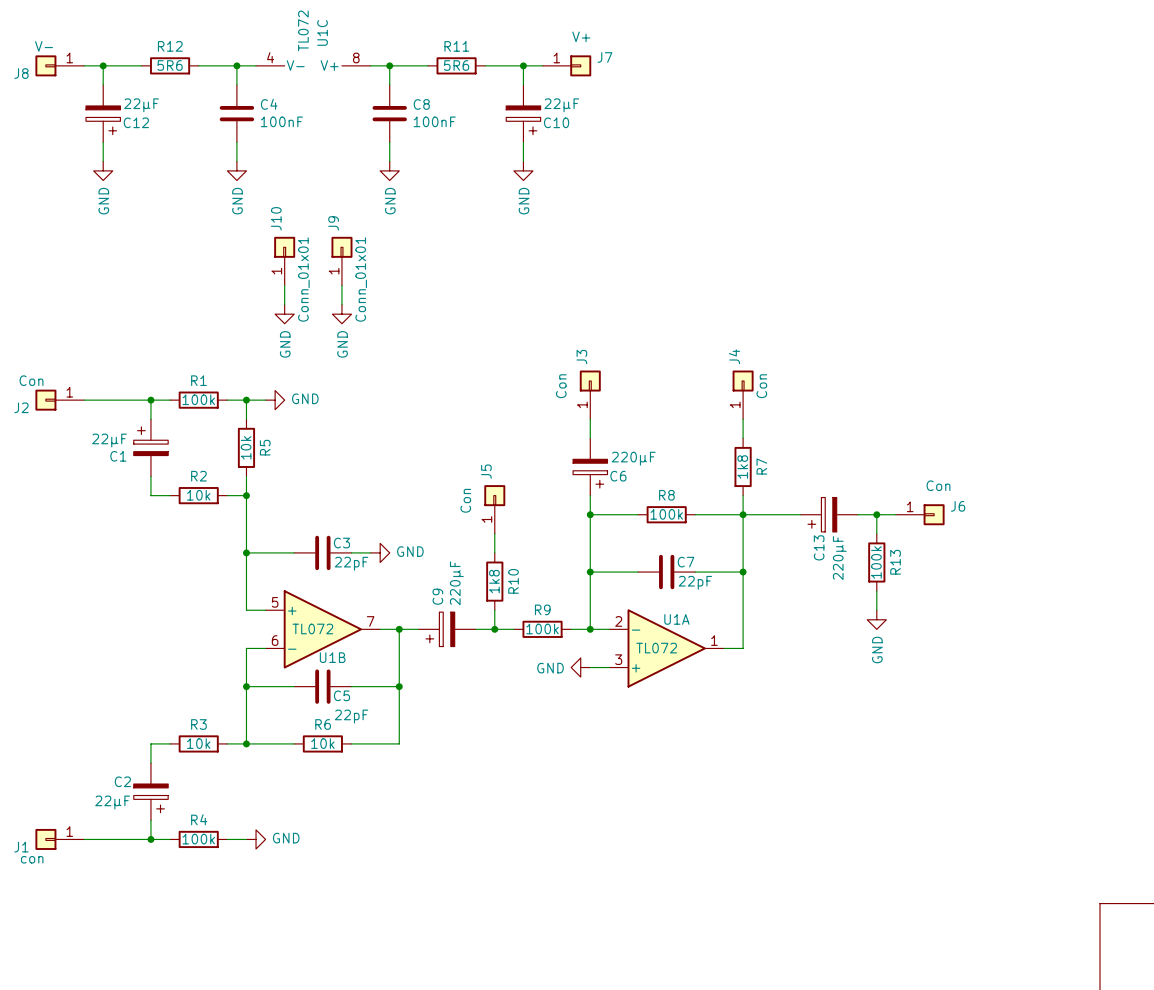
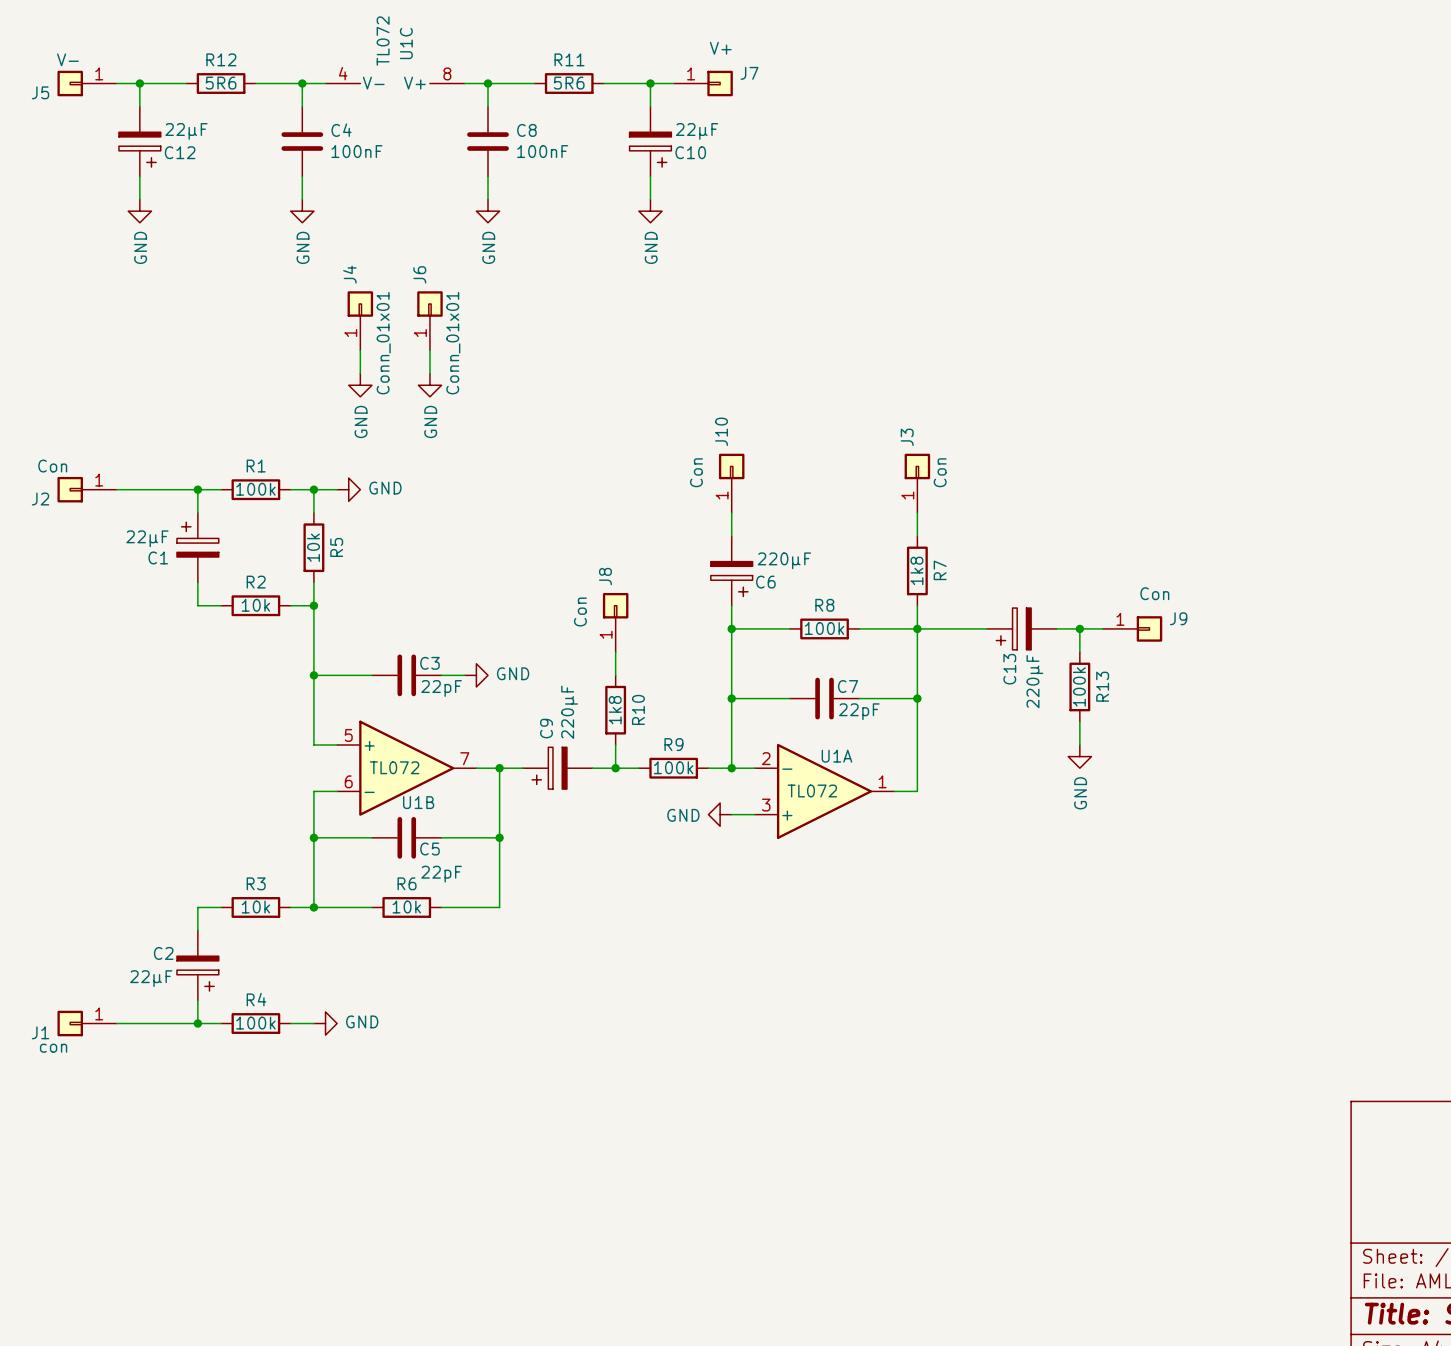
J8 name: J8 (21, 73) -> J5 (40, 92)
J10 name: J10 (276, 218) -> J4 (349, 274)
J9 name: J9 (333, 223) -> J6 (419, 274)
J4 name: J4 (734, 356) -> J3 (907, 437)
J3 name: J3 (581, 357) -> J10 (721, 431)
J5 name: J5 (486, 471) -> J8 (605, 576)
J6 name: J6 (958, 506) -> J9 (1178, 618)

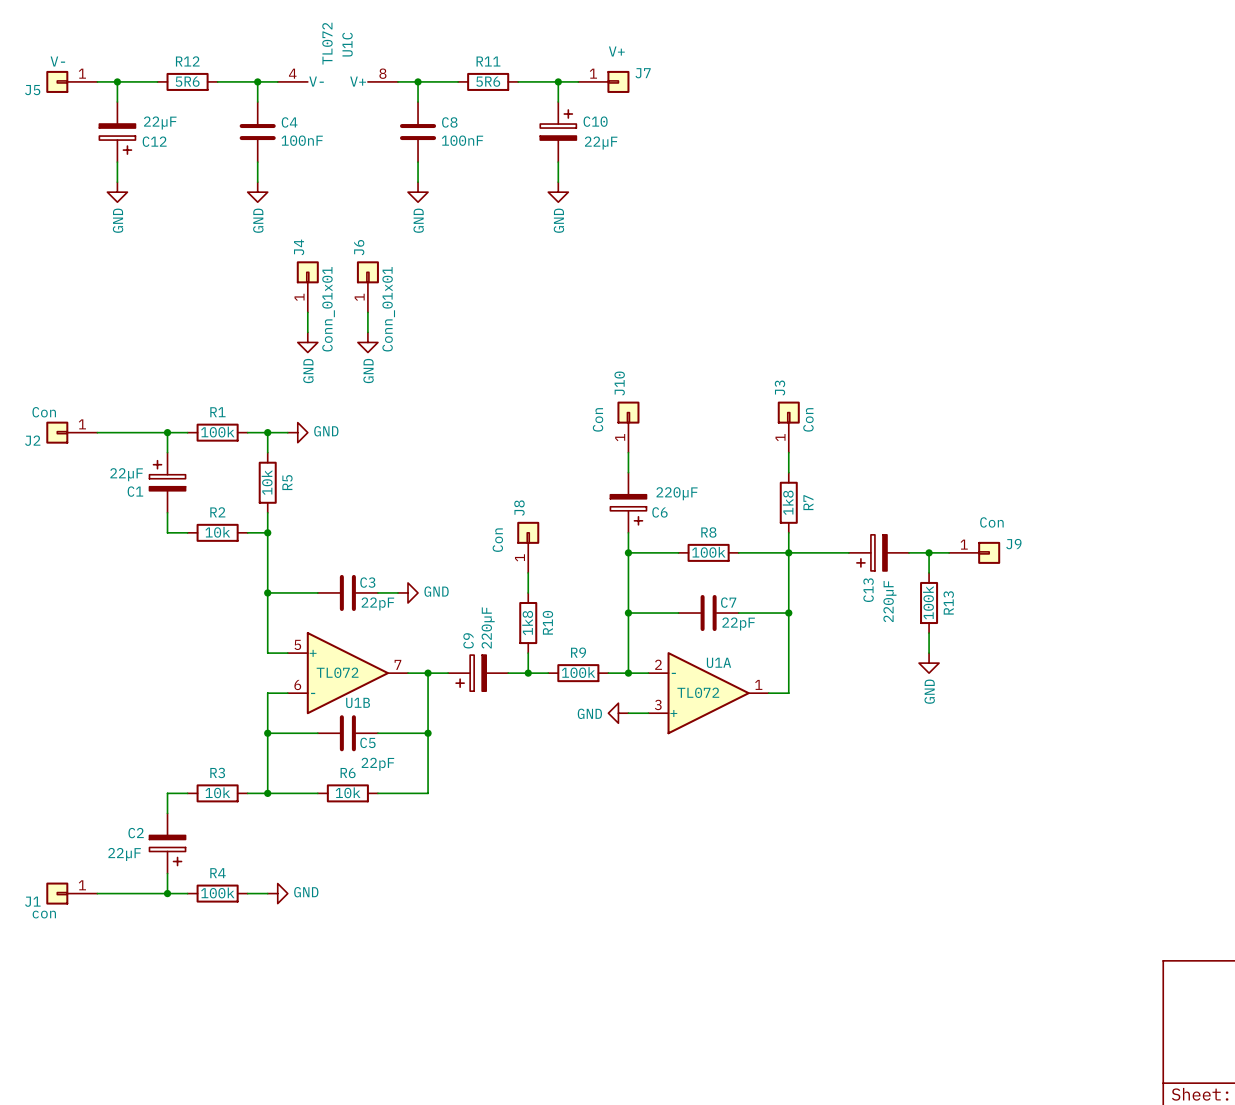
C10 flip: as is (650, 149) -> up-down (558, 125)

